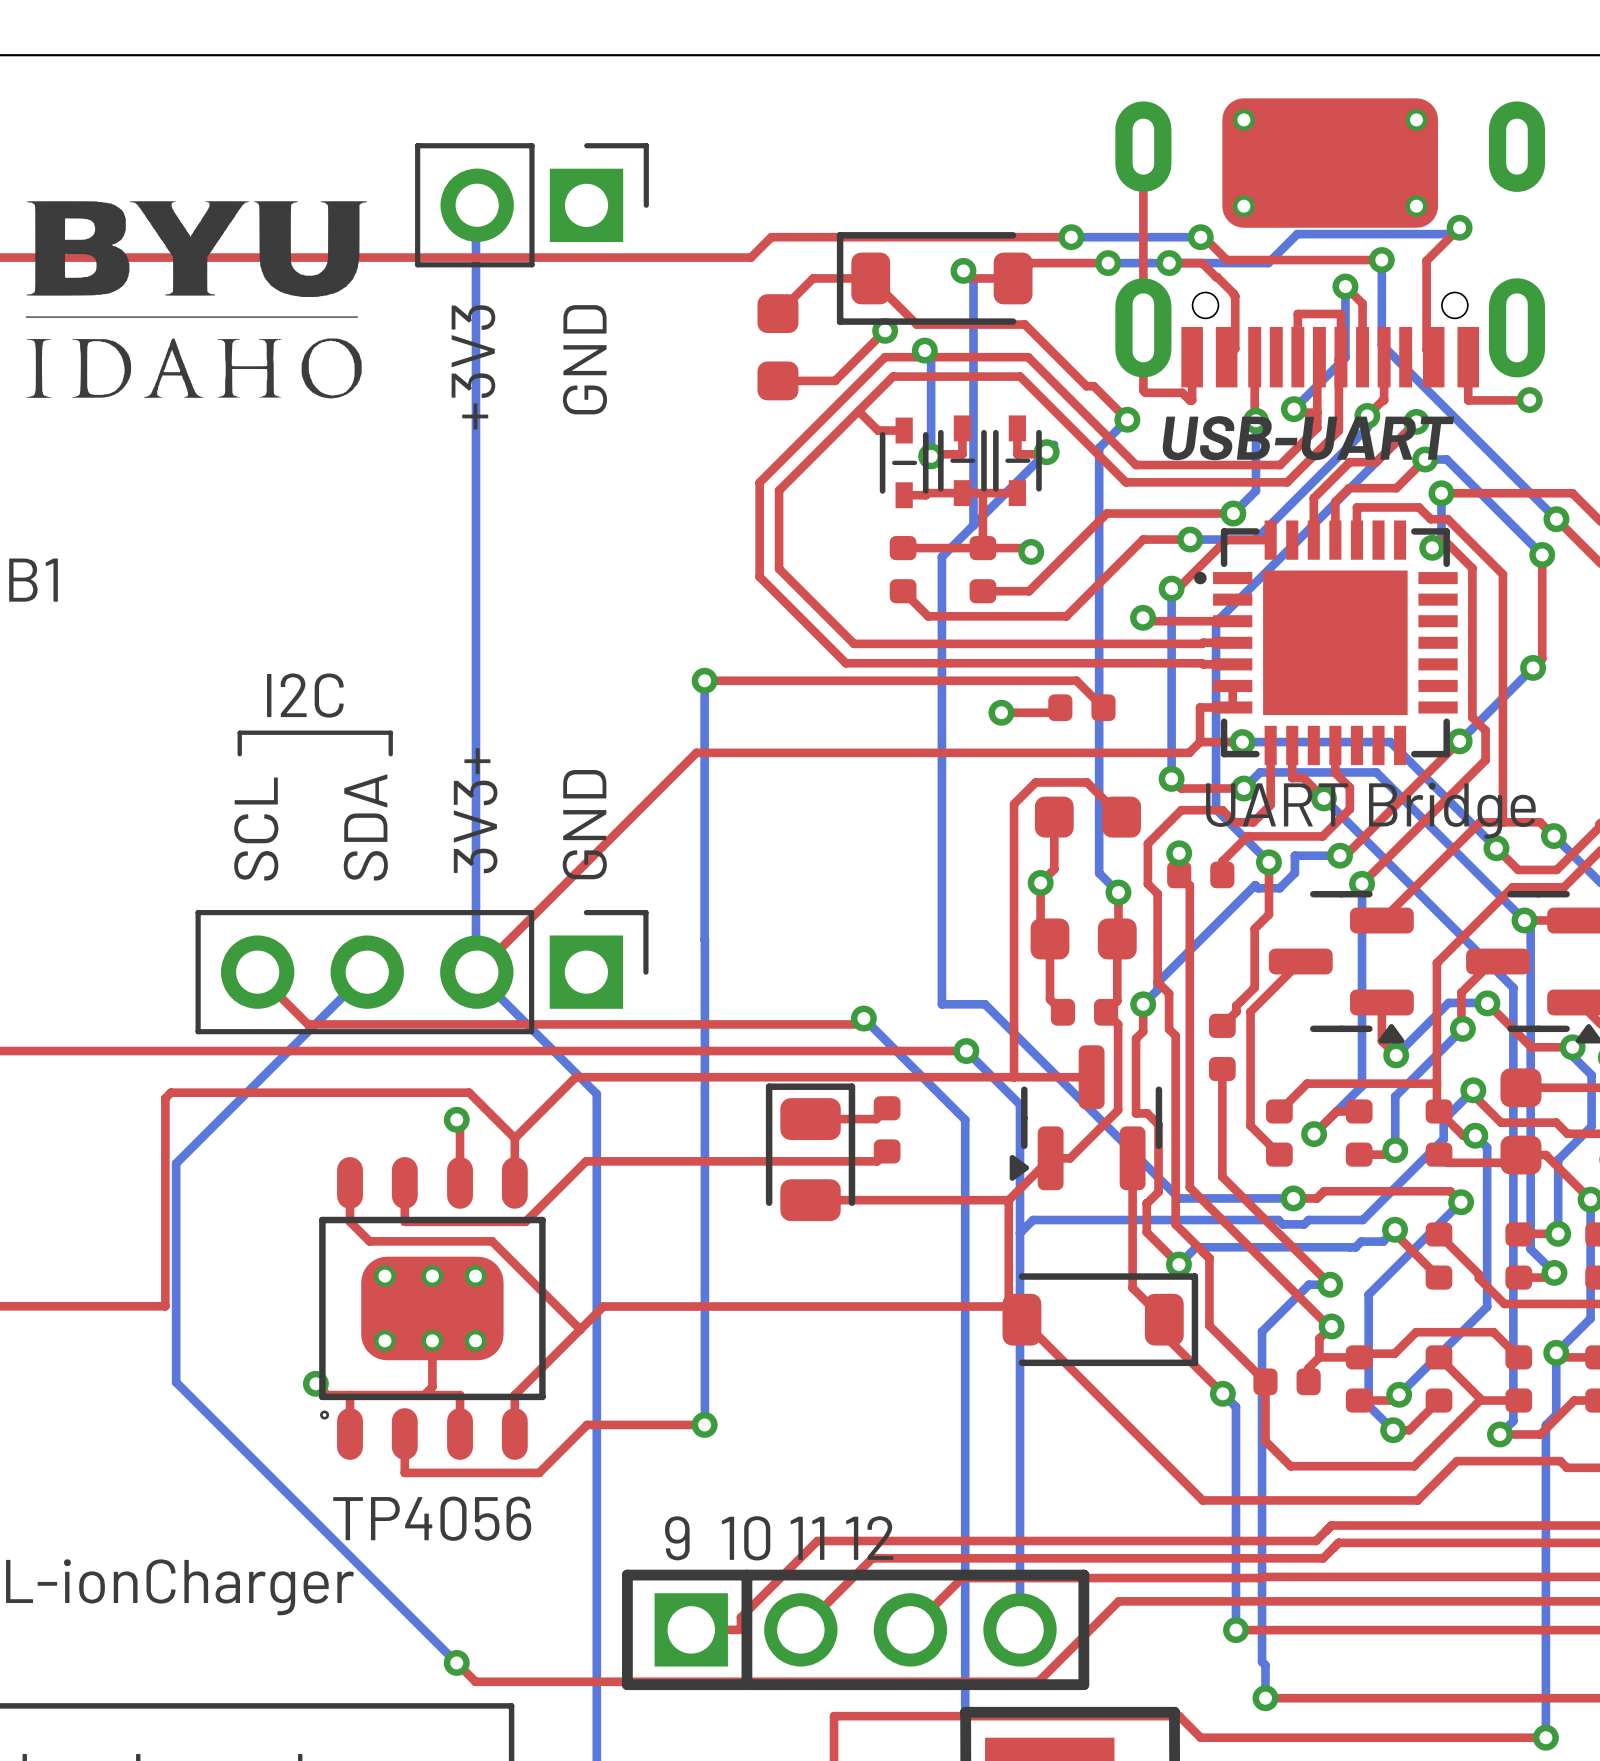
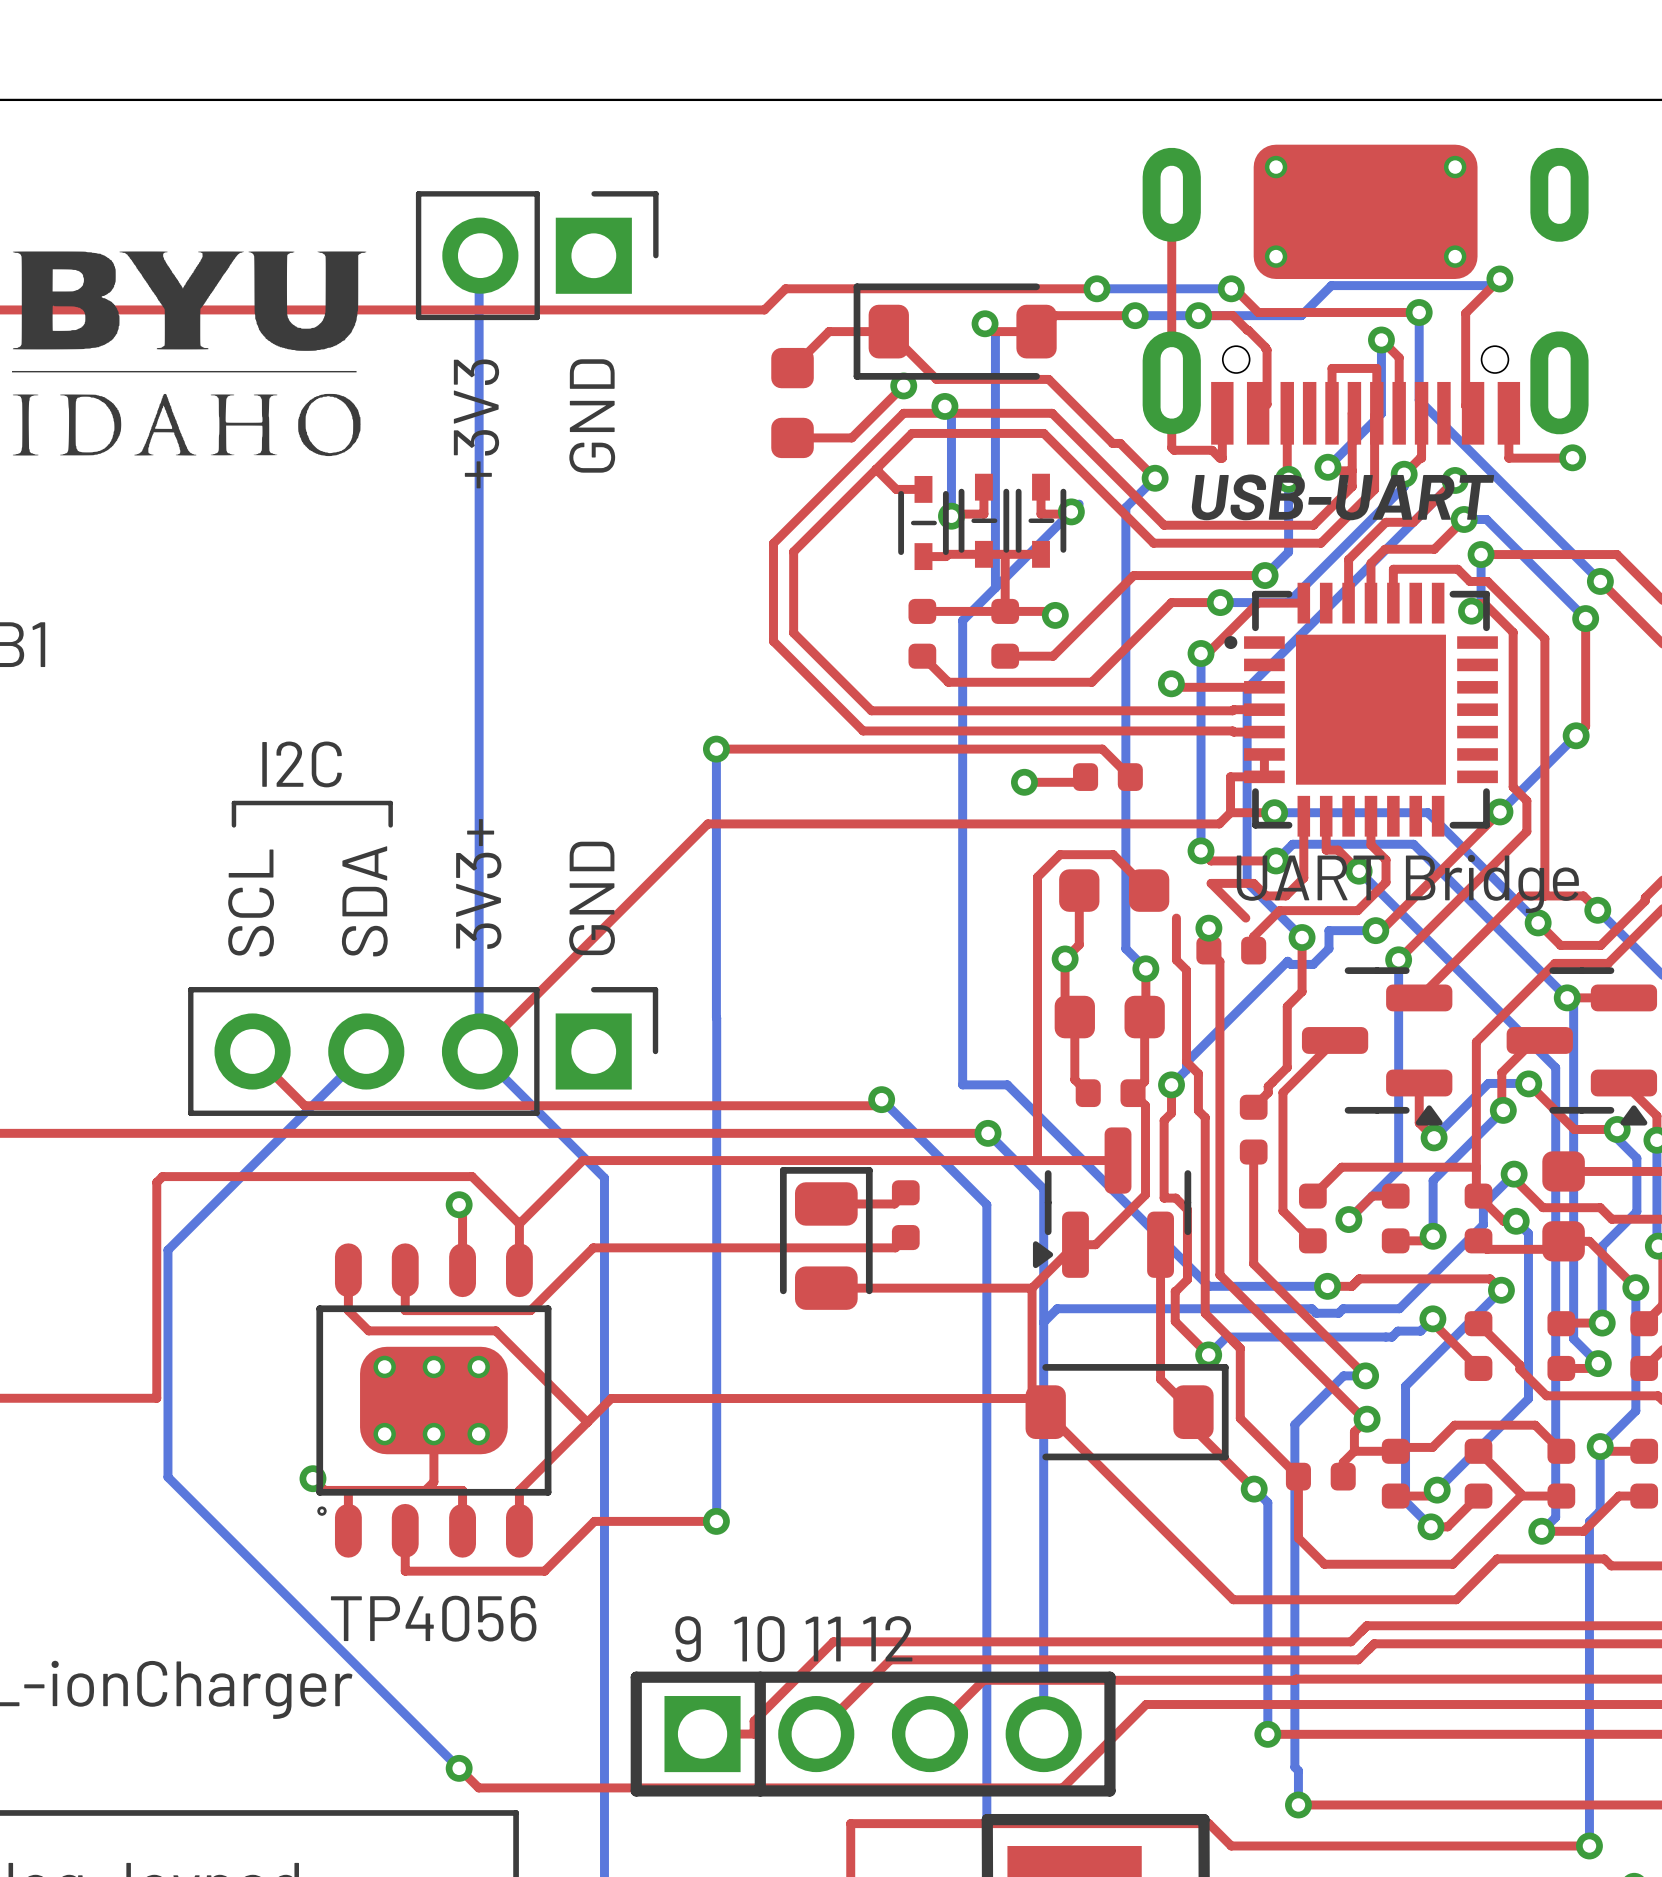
top track: (1181, 810) (1147, 843) -> (1211, 883) (1245, 918)

